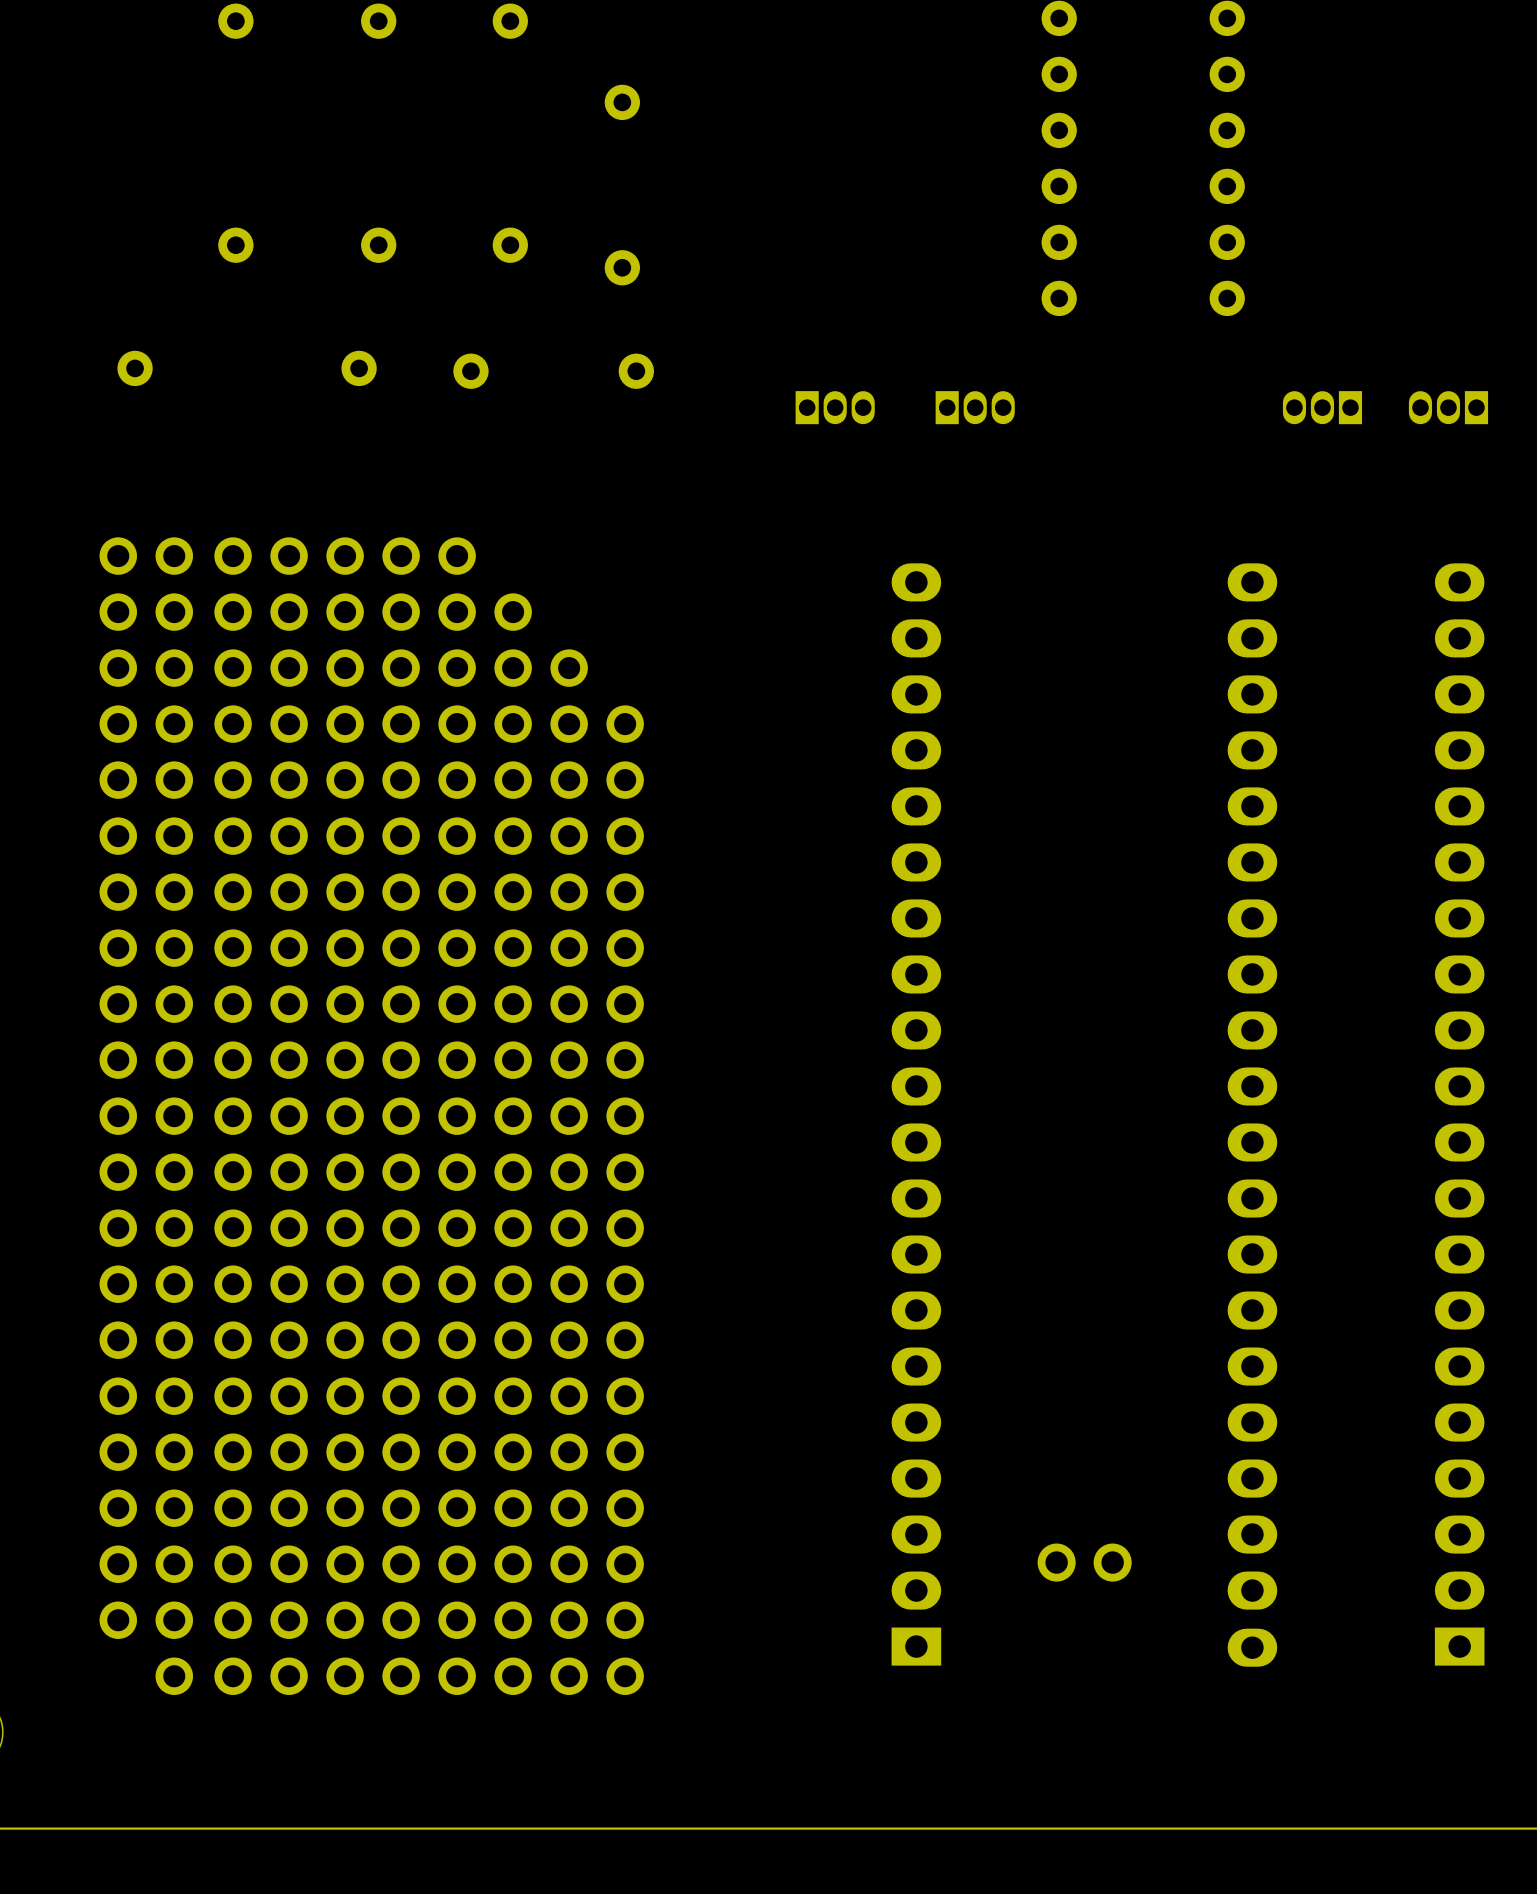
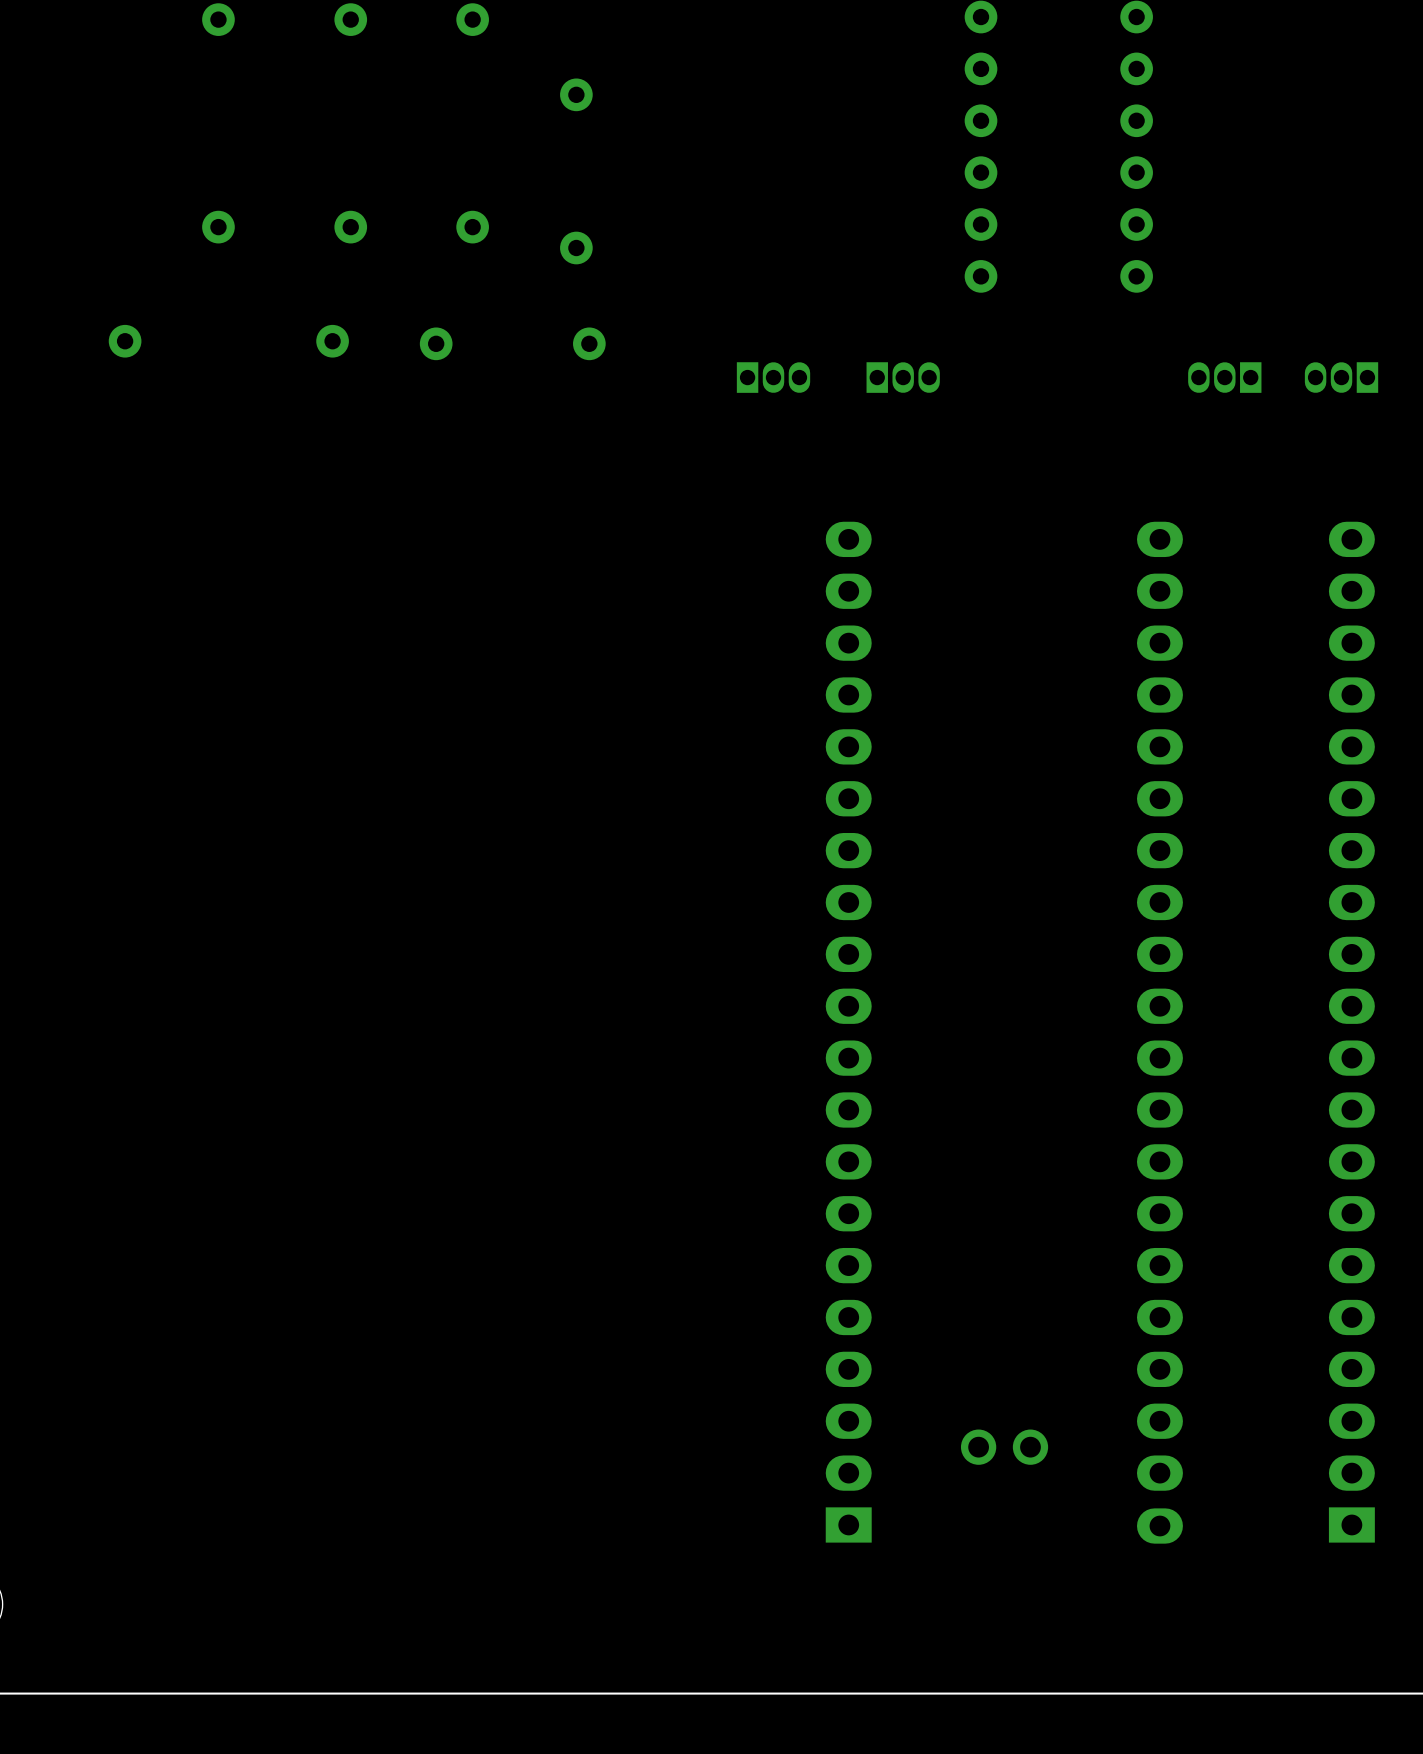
part: (146, 1116) -> none
part: (261, 1116) -> none
part: (373, 1116) -> none
part: (485, 1116) -> none
part: (597, 1172) -> none

